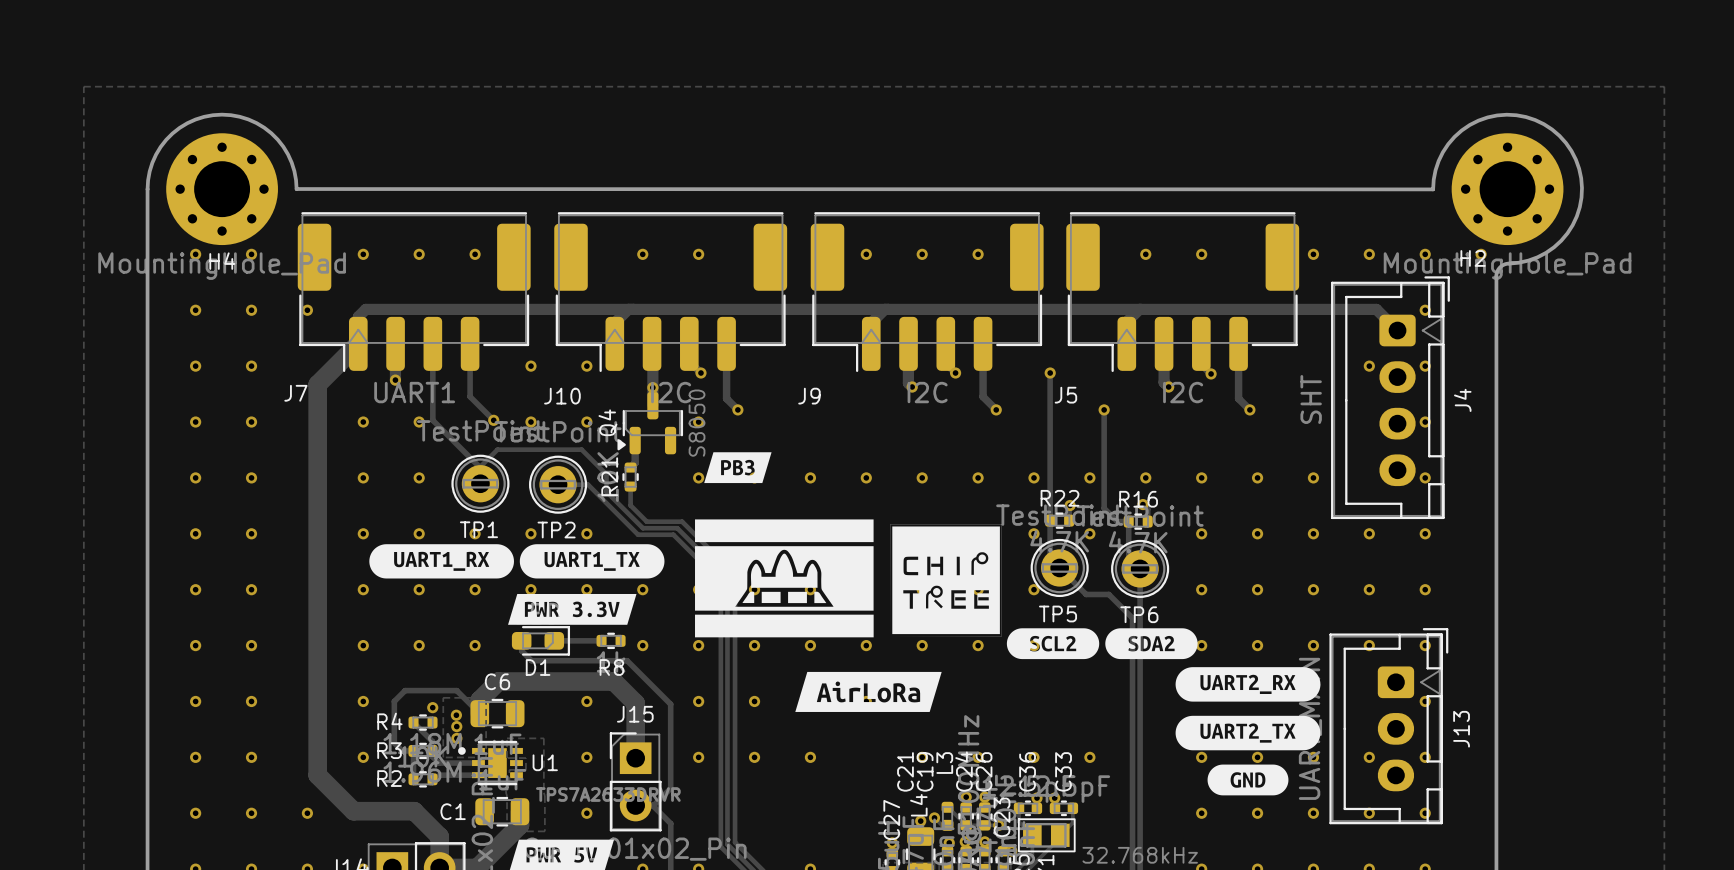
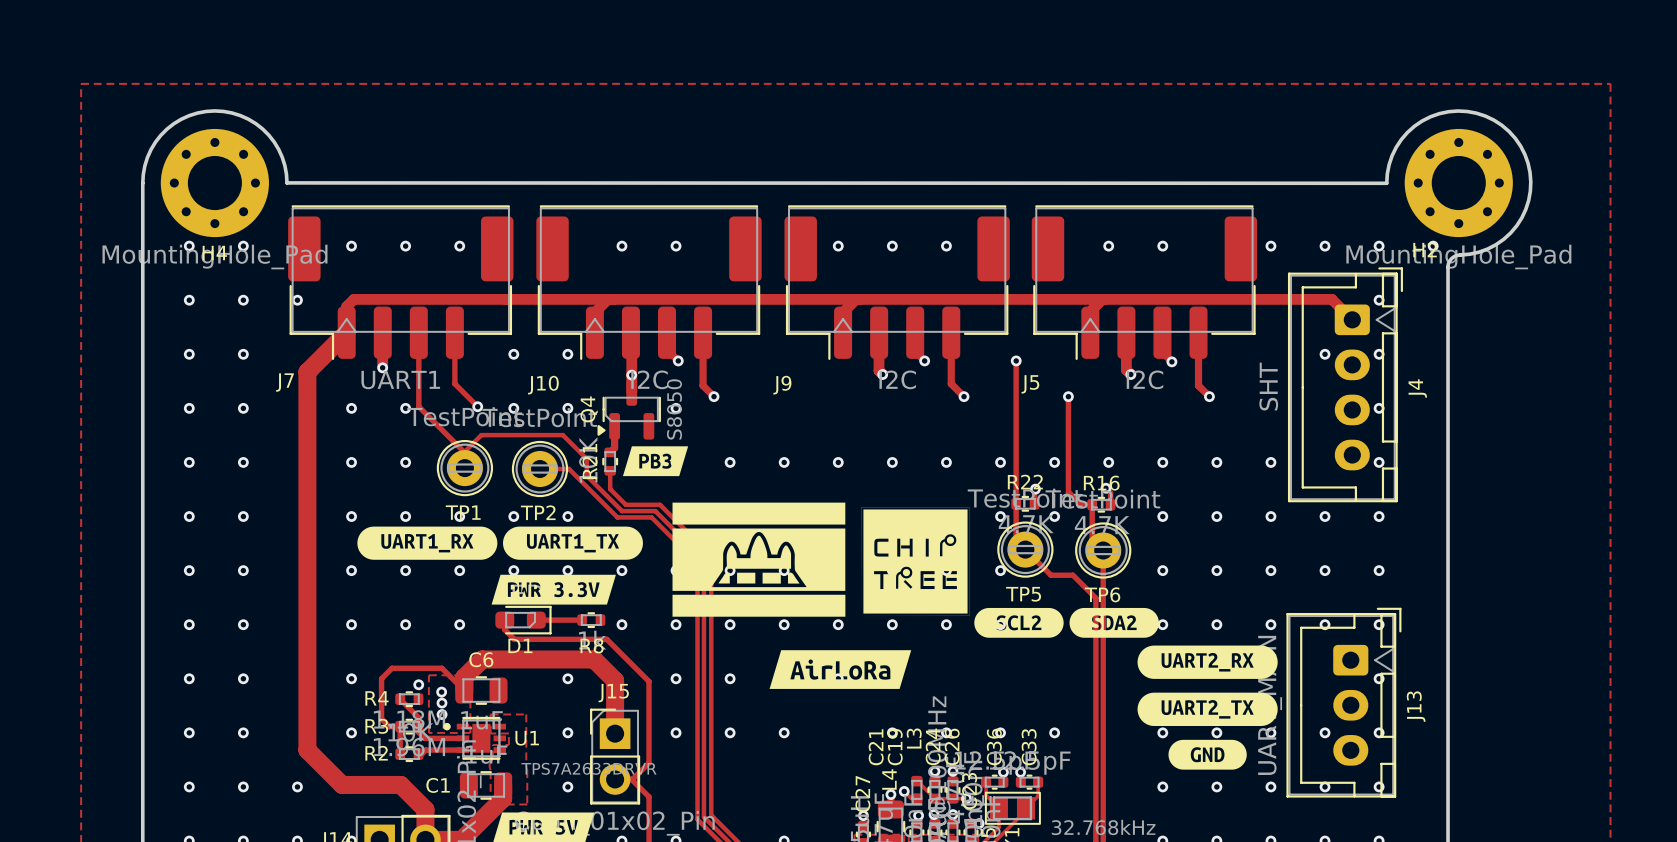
drawing position: (737, 467) -> (655, 461)

